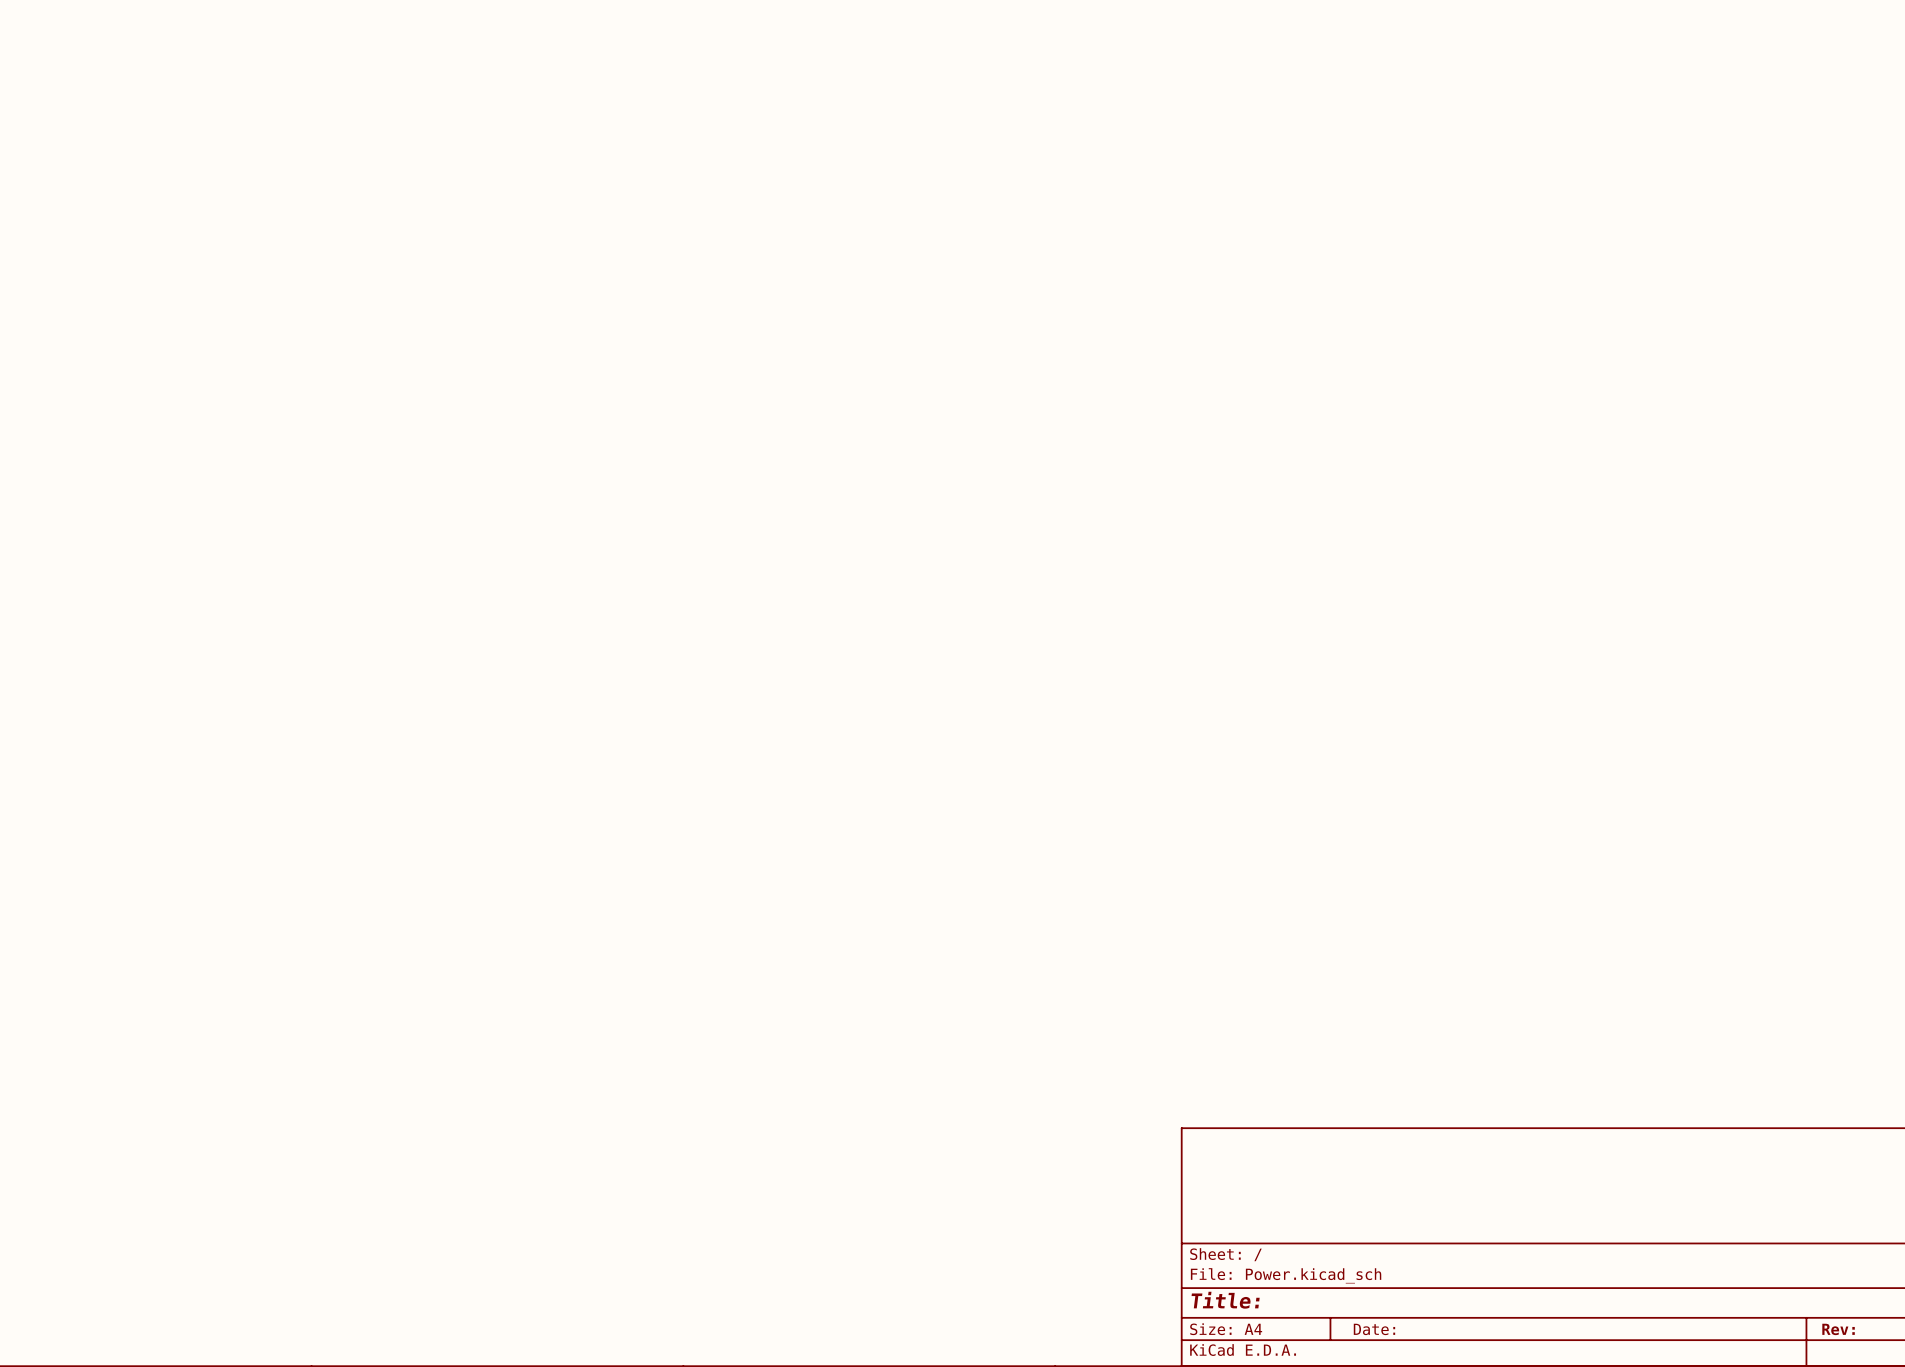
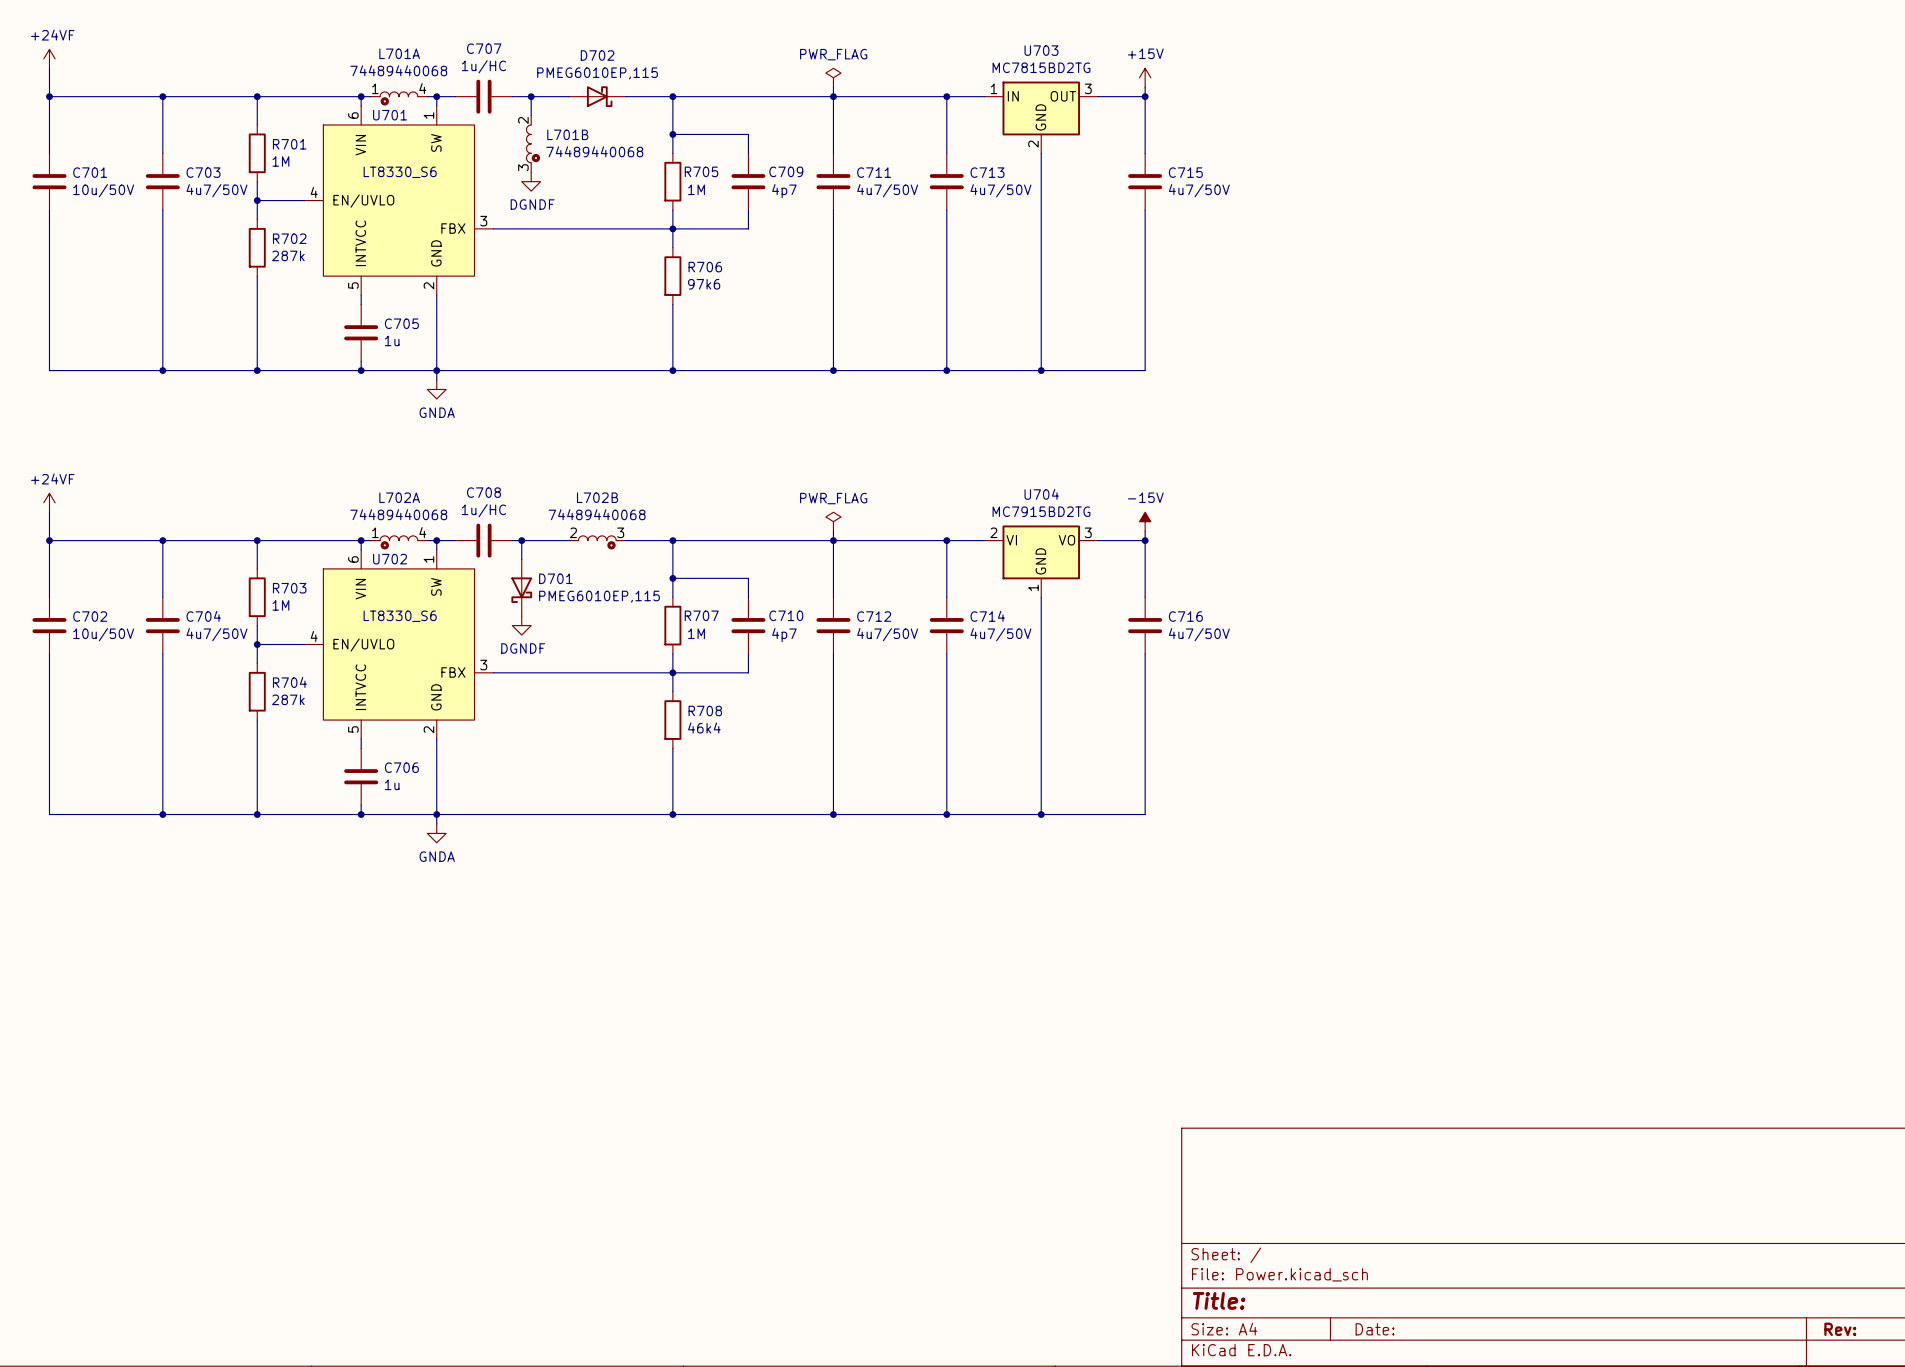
power symbol: none -> +24VF (49, 58)
wire: none -> (49, 68) (49, 153)
power symbol: none -> PWR_FLAG (833, 77)
power symbol: none -> +15V (1145, 77)
wire: none -> (833, 87) (833, 153)
wire: none -> (1145, 87) (1145, 153)
wire: none -> (49, 96) (370, 96)
junction: none -> (49, 96)
wire: none -> (162, 96) (162, 153)
junction: none -> (162, 96)
wire: none -> (257, 96) (257, 124)
junction: none -> (257, 96)
wire: none -> (361, 96) (361, 106)
junction: none -> (361, 96)
wire: none -> (427, 96) (455, 96)
wire: none -> (436, 96) (436, 106)
junction: none -> (436, 96)
C707: none -> 1u/HC (483, 96)
wire: none -> (512, 96) (568, 96)
wire: none -> (531, 96) (531, 115)
junction: none -> (531, 96)
D702: none -> PMEG6010EP,115 (597, 96)
wire: none -> (625, 96) (984, 96)
wire: none -> (672, 96) (672, 153)
junction: none -> (672, 96)
junction: none -> (833, 96)
wire: none -> (946, 96) (946, 153)
junction: none -> (946, 96)
wire: none -> (1097, 96) (1145, 96)
junction: none -> (1145, 96)
L701A: none -> 74489440068 (398, 98)
U703: none -> MC7815BD2TG (1041, 117)
wire: none -> (672, 134) (748, 134) (748, 153)
junction: none -> (672, 134)
L701B: none -> 74489440068 (533, 143)
R701: none -> 1M (257, 153)
wire: none -> (1041, 153) (1041, 370)
C701: none -> 10u/50V (49, 181)
C703: none -> 4u7/50V (162, 181)
wire: none -> (257, 181) (257, 219)
power symbol: none -> DGNDF (531, 181)
R705: none -> 1M (672, 181)
C709: none -> 4p7 (748, 181)
C711: none -> 4u7/50V (833, 181)
C713: none -> 4u7/50V (946, 181)
C715: none -> 4u7/50V (1145, 181)
wire: none -> (257, 200) (304, 200)
junction: none -> (257, 200)
U701: none -> LT8330_S6 (398, 200)
wire: none -> (49, 210) (49, 370) (1145, 370) (1145, 210)
wire: none -> (162, 210) (162, 370)
wire: none -> (672, 210) (672, 247)
wire: none -> (748, 210) (748, 228) (493, 228)
wire: none -> (833, 210) (833, 370)
wire: none -> (946, 210) (946, 370)
junction: none -> (672, 228)
R702: none -> 287k (257, 247)
wire: none -> (257, 276) (257, 370)
R706: none -> 97k6 (672, 276)
wire: none -> (361, 295) (361, 304)
wire: none -> (436, 295) (436, 380)
wire: none -> (672, 304) (672, 370)
C705: none -> 1u (361, 332)
wire: none -> (361, 361) (361, 370)
junction: none -> (162, 370)
junction: none -> (257, 370)
junction: none -> (361, 370)
junction: none -> (436, 370)
junction: none -> (672, 370)
junction: none -> (833, 370)
junction: none -> (946, 370)
junction: none -> (1041, 370)
power symbol: none -> GNDA (436, 389)
power symbol: none -> +24VF (49, 502)
wire: none -> (49, 512) (49, 597)
power symbol: none -> PWR_FLAG (833, 521)
power symbol: none -> -15V (1145, 521)
wire: none -> (833, 531) (833, 597)
wire: none -> (1145, 531) (1145, 597)
wire: none -> (49, 540) (370, 540)
junction: none -> (49, 540)
wire: none -> (162, 540) (162, 597)
junction: none -> (162, 540)
wire: none -> (257, 540) (257, 568)
junction: none -> (257, 540)
wire: none -> (361, 540) (361, 550)
junction: none -> (361, 540)
wire: none -> (427, 540) (455, 540)
wire: none -> (436, 540) (436, 550)
junction: none -> (436, 540)
C708: none -> 1u/HC (483, 540)
wire: none -> (512, 540) (568, 540)
wire: none -> (521, 540) (521, 559)
junction: none -> (521, 540)
wire: none -> (625, 540) (984, 540)
wire: none -> (672, 540) (672, 597)
junction: none -> (672, 540)
junction: none -> (833, 540)
wire: none -> (946, 540) (946, 597)
junction: none -> (946, 540)
wire: none -> (1097, 540) (1145, 540)
junction: none -> (1145, 540)
L702A: none -> 74489440068 (398, 542)
L702B: none -> 74489440068 (597, 542)
U704: none -> MC7915BD2TG (1041, 561)
wire: none -> (672, 578) (748, 578) (748, 597)
junction: none -> (672, 578)
D701: none -> PMEG6010EP,115 (521, 587)
R703: none -> 1M (257, 597)
wire: none -> (1041, 597) (1041, 814)
C702: none -> 10u/50V (49, 625)
C704: none -> 4u7/50V (162, 625)
wire: none -> (257, 625) (257, 663)
power symbol: none -> DGNDF (521, 625)
R707: none -> 1M (672, 625)
C710: none -> 4p7 (748, 625)
C712: none -> 4u7/50V (833, 625)
C714: none -> 4u7/50V (946, 625)
C716: none -> 4u7/50V (1145, 625)
wire: none -> (257, 644) (304, 644)
junction: none -> (257, 644)
U702: none -> LT8330_S6 (398, 644)
wire: none -> (49, 653) (49, 814) (1145, 814) (1145, 653)
wire: none -> (162, 653) (162, 814)
wire: none -> (672, 653) (672, 691)
wire: none -> (748, 653) (748, 672) (493, 672)
wire: none -> (833, 653) (833, 814)
wire: none -> (946, 653) (946, 814)
junction: none -> (672, 672)
R704: none -> 287k (257, 691)
wire: none -> (257, 720) (257, 814)
R708: none -> 46k4 (672, 720)
wire: none -> (361, 738) (361, 748)
wire: none -> (436, 738) (436, 823)
wire: none -> (672, 748) (672, 814)
C706: none -> 1u (361, 776)
wire: none -> (361, 805) (361, 814)
junction: none -> (162, 814)
junction: none -> (257, 814)
junction: none -> (361, 814)
junction: none -> (436, 814)
junction: none -> (672, 814)
junction: none -> (833, 814)
junction: none -> (946, 814)
junction: none -> (1041, 814)
power symbol: none -> GNDA (436, 833)

